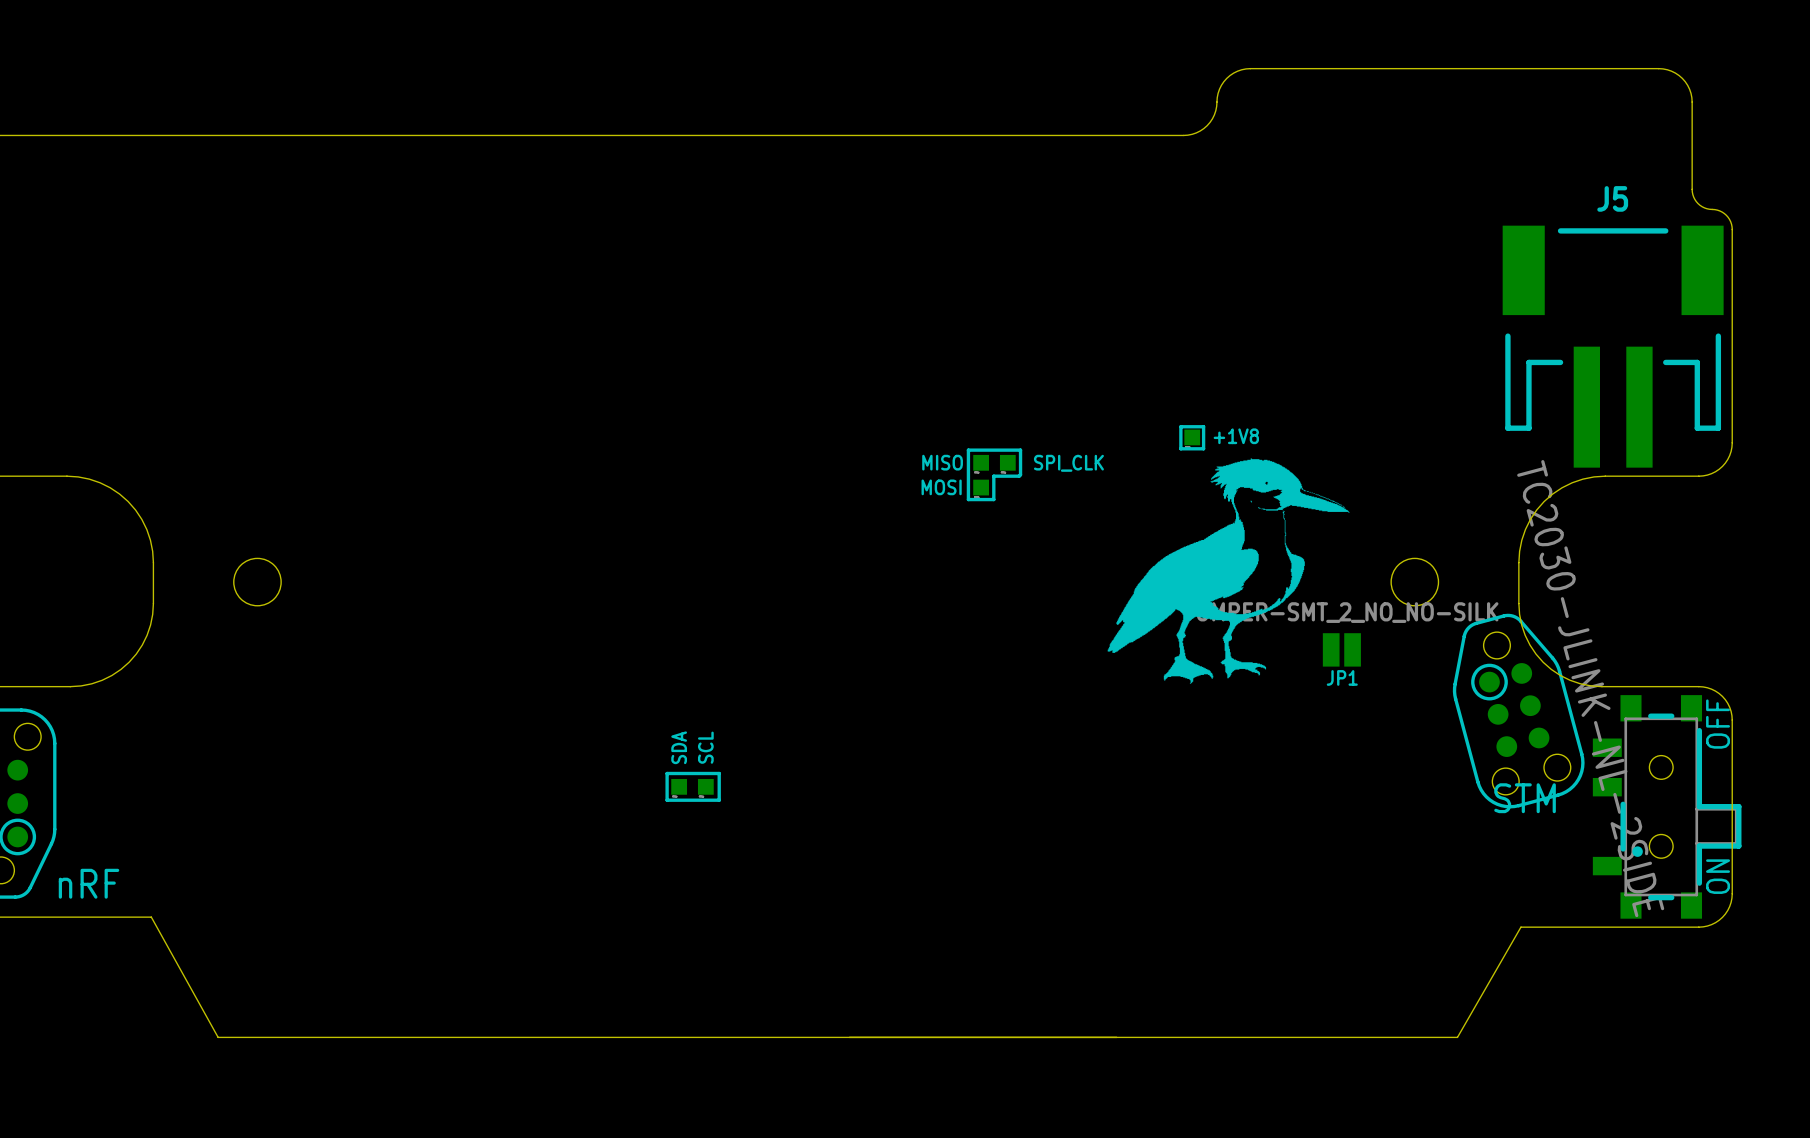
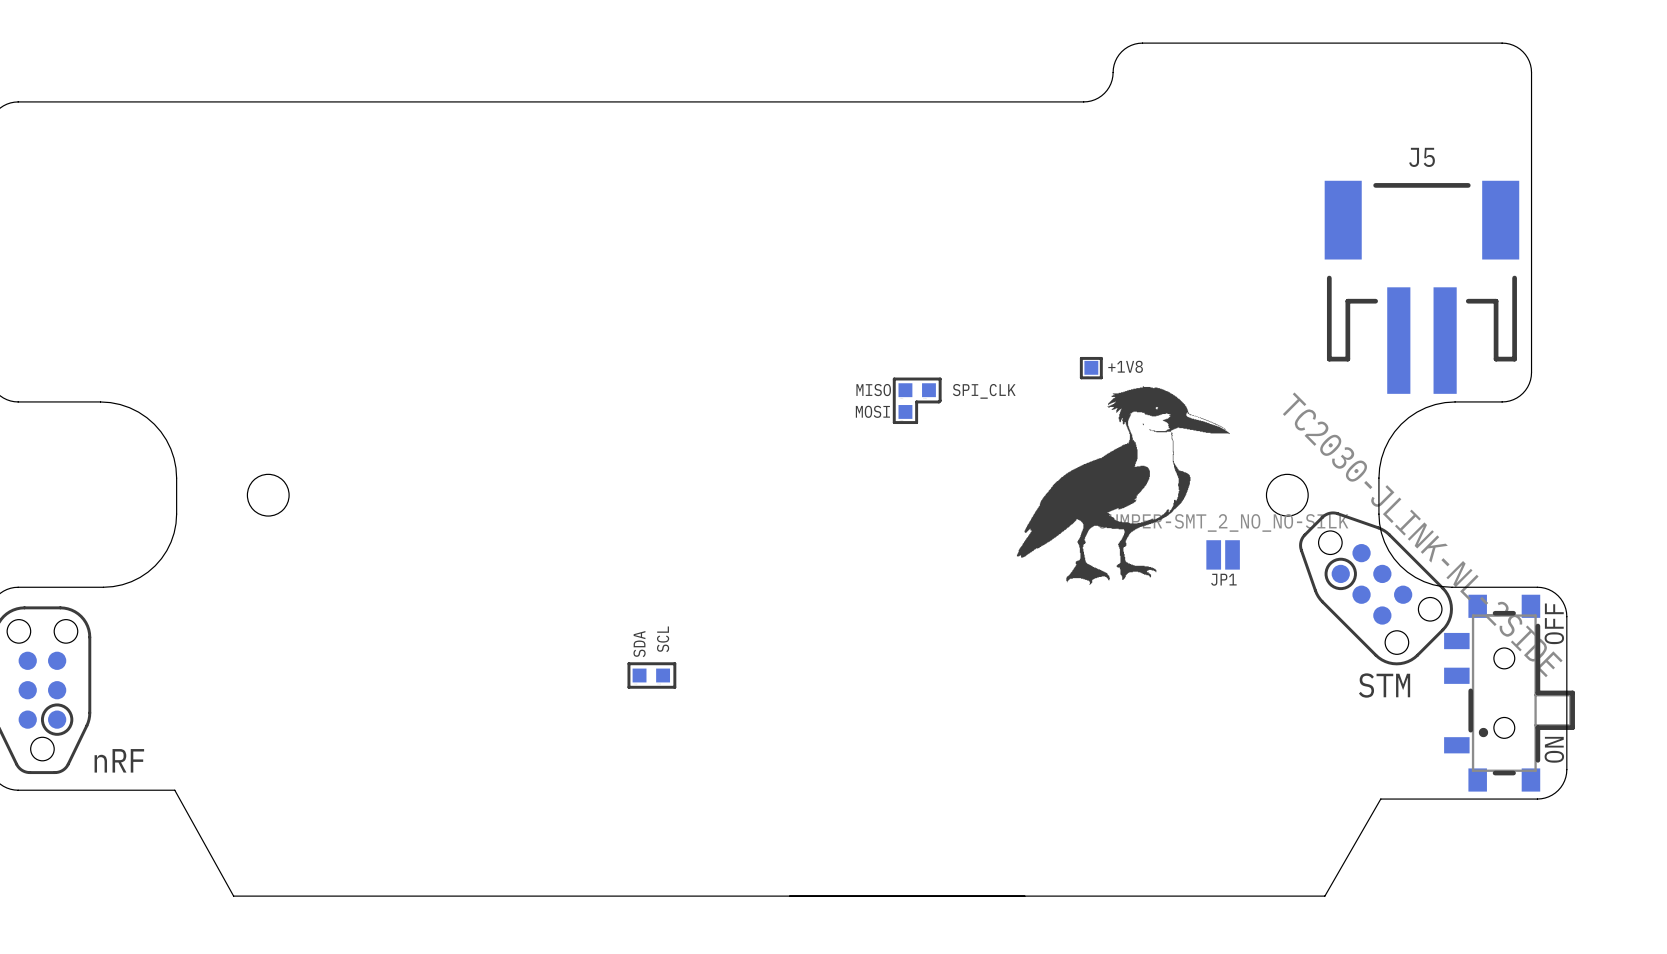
board edge: (1692, 189) (1693, 197) (1698, 203) (1704, 207) (1724, 213) (1729, 219) (1732, 226) (1731, 447) (1725, 463) (1711, 473) (1698, 476) (1658, 476) -> (1531, 149) (1531, 376) (1527, 387) (1520, 395) (1502, 401)
J5 position: (1613, 346) -> (1421, 287)
part rotation: 0° (1518, 711) -> 30° counterclockwise (1376, 588)

